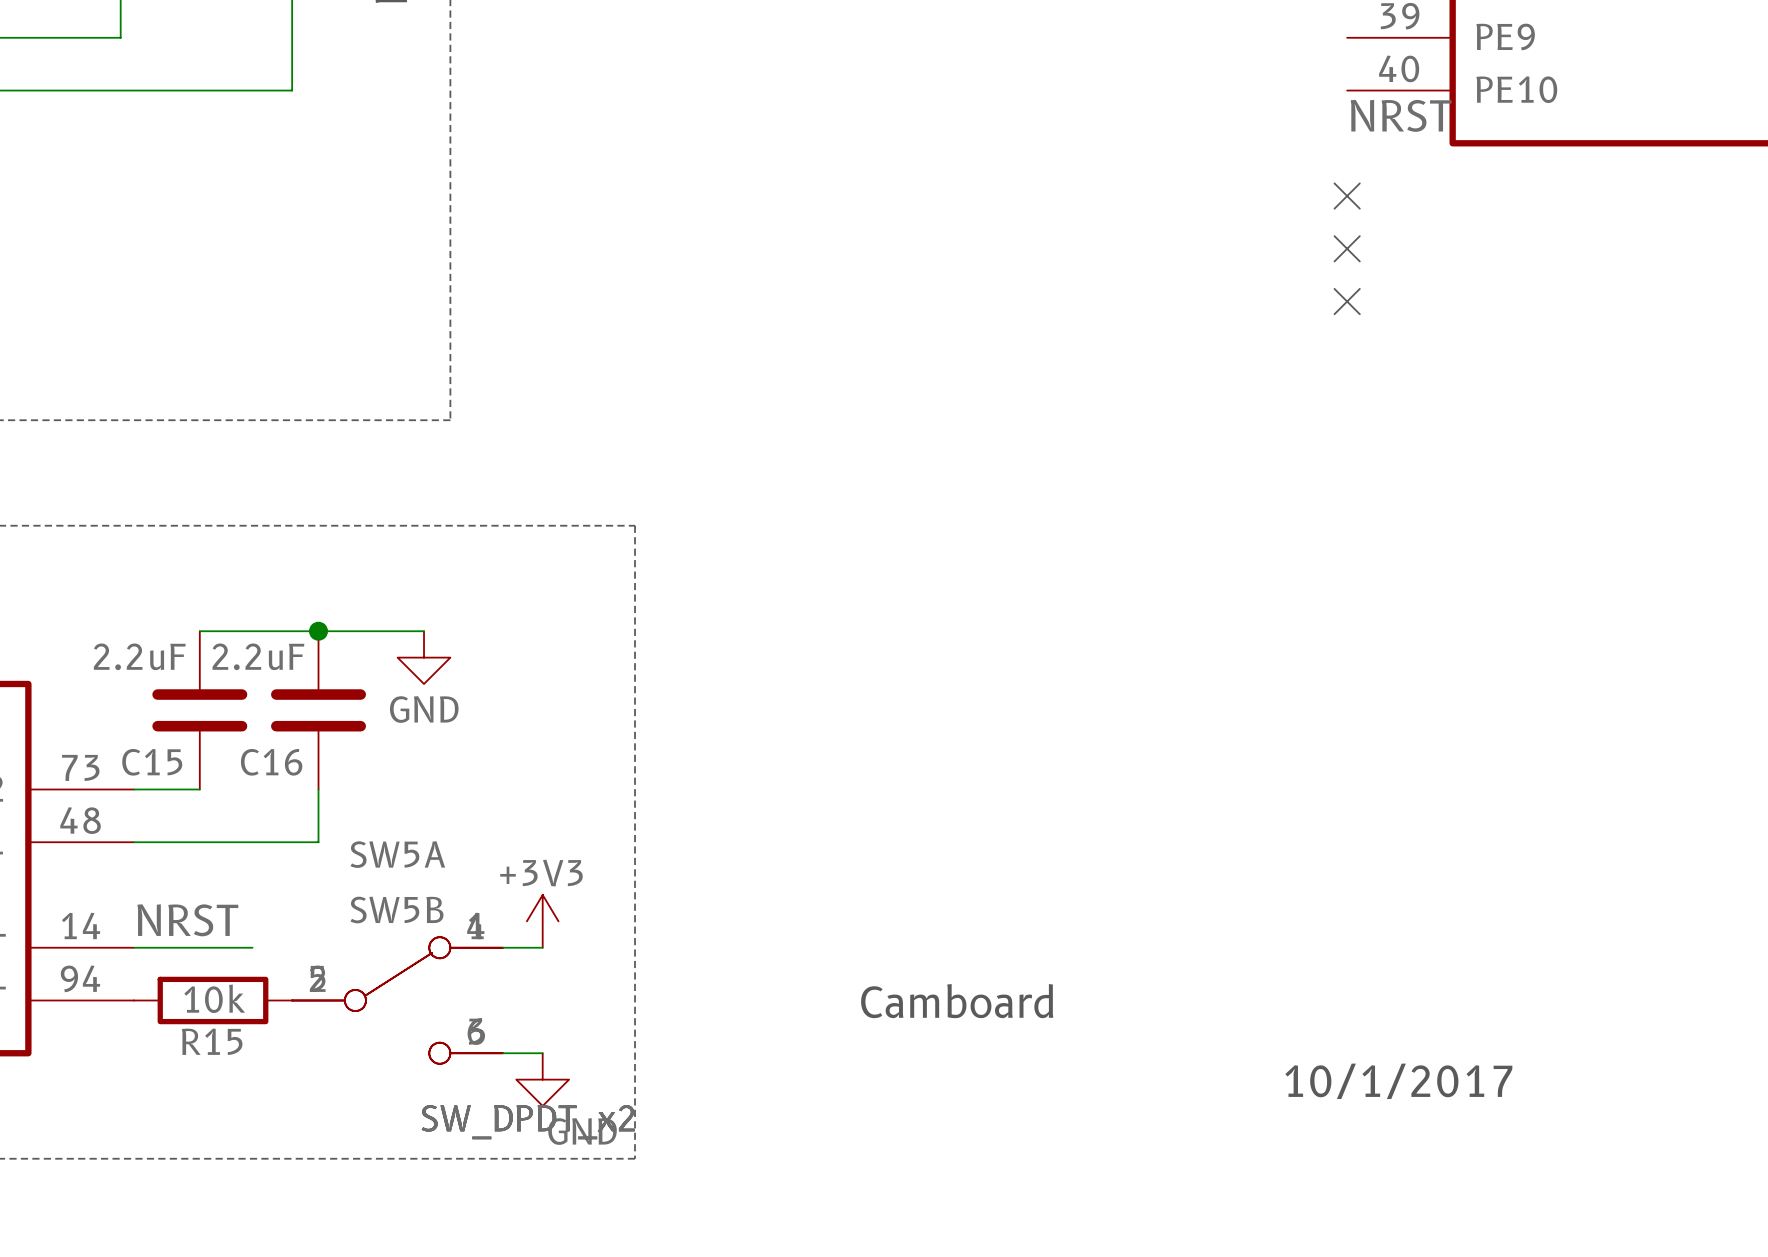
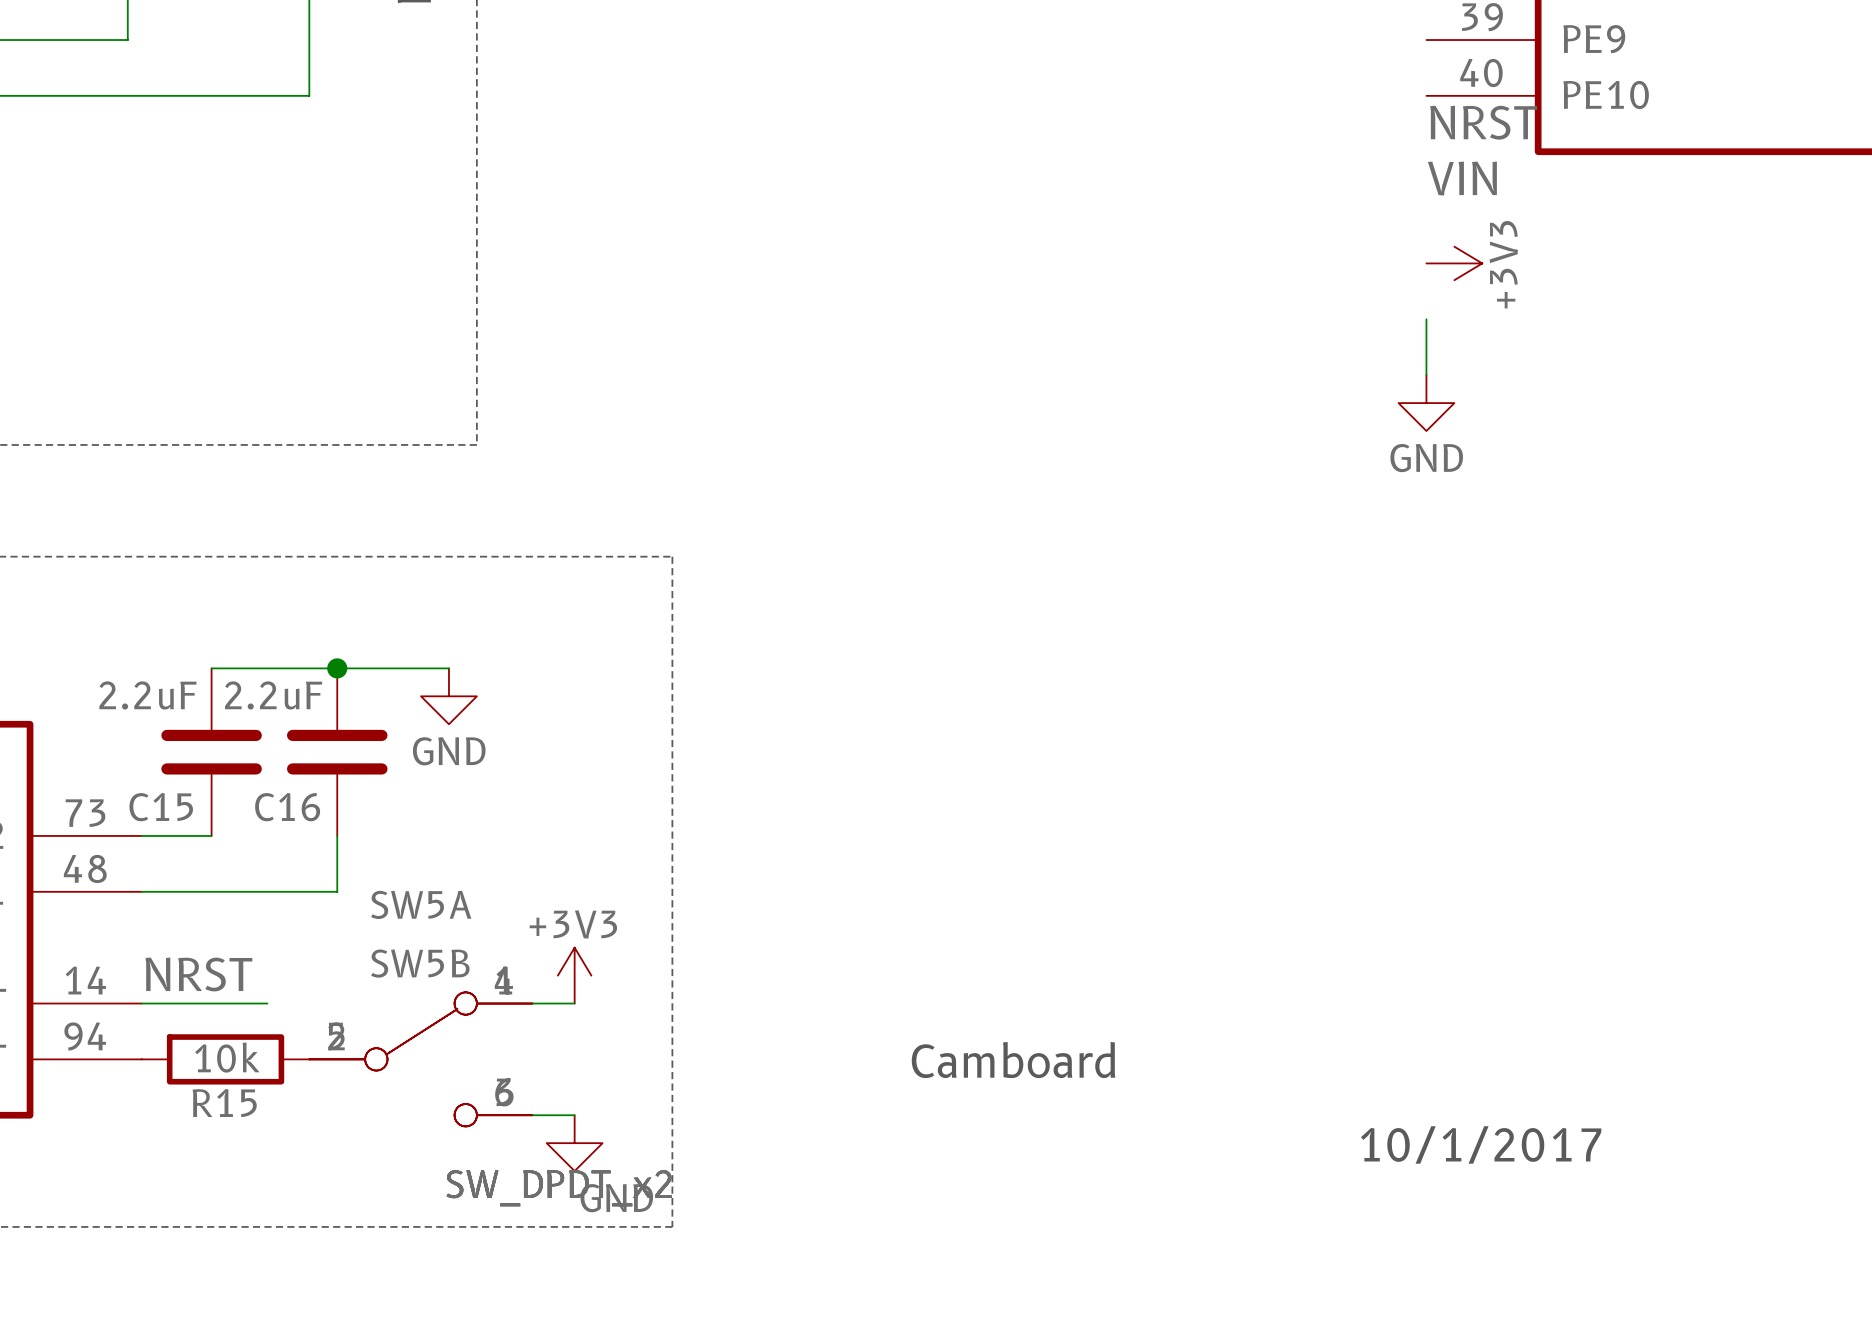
label: none -> VIN (1462, 178)
no-connect mark: (1347, 196) -> none
no-connect mark: (1347, 248) -> none
power symbol: none -> +3V3 (1454, 263)
wire: none -> (1426, 319) (1426, 375)
no-connect mark: (1347, 301) -> none
power symbol: none -> GND (1426, 403)

